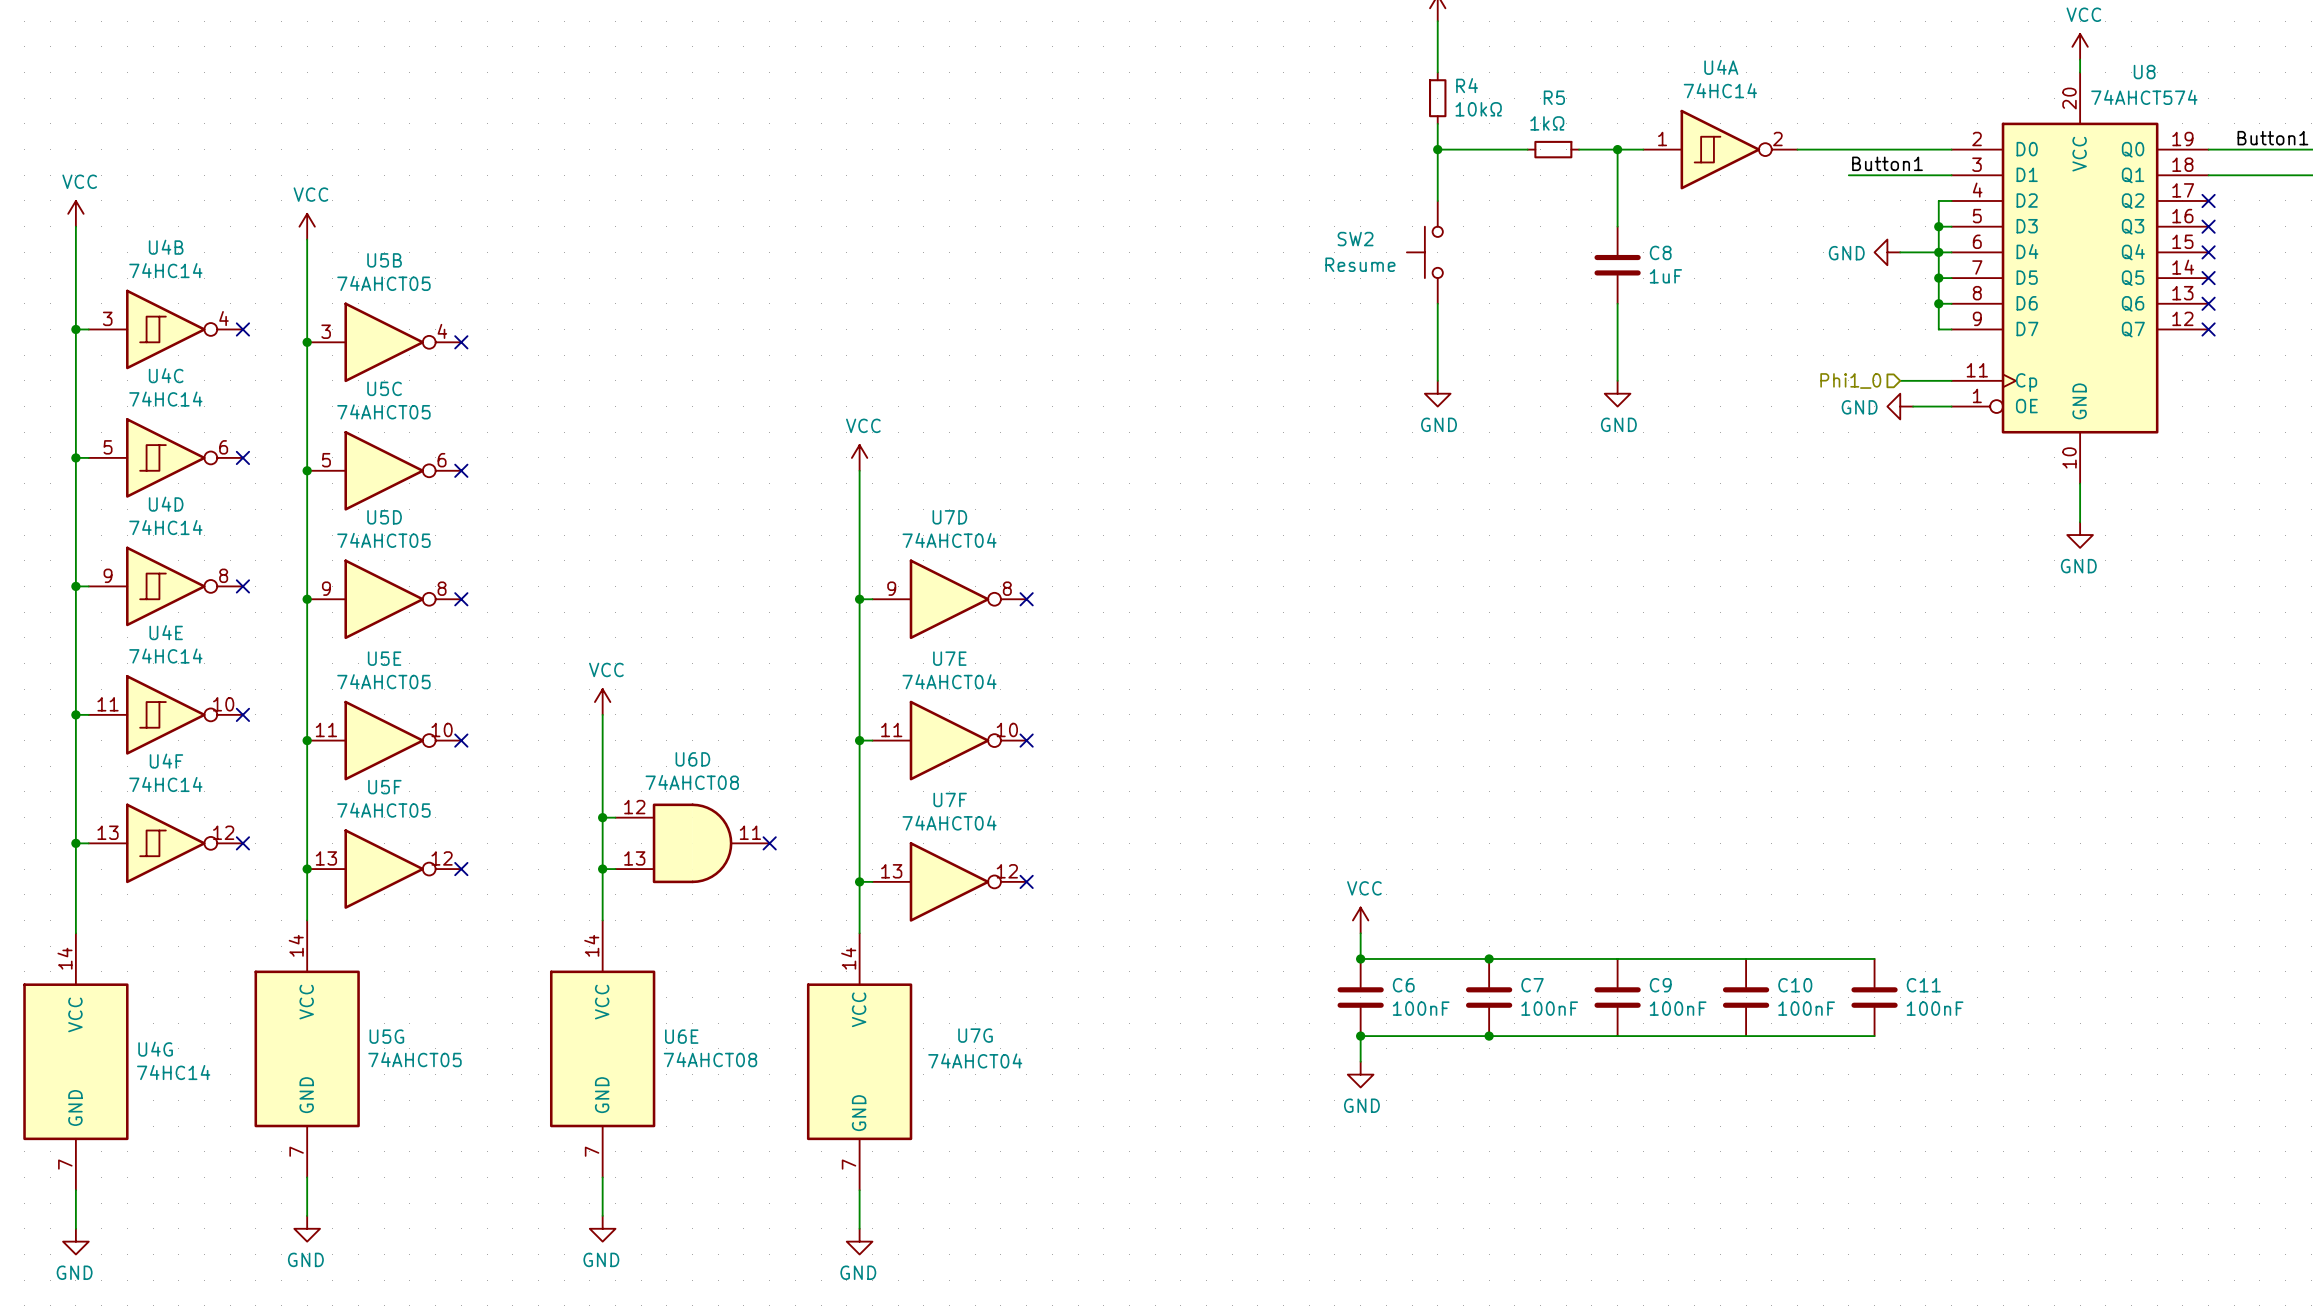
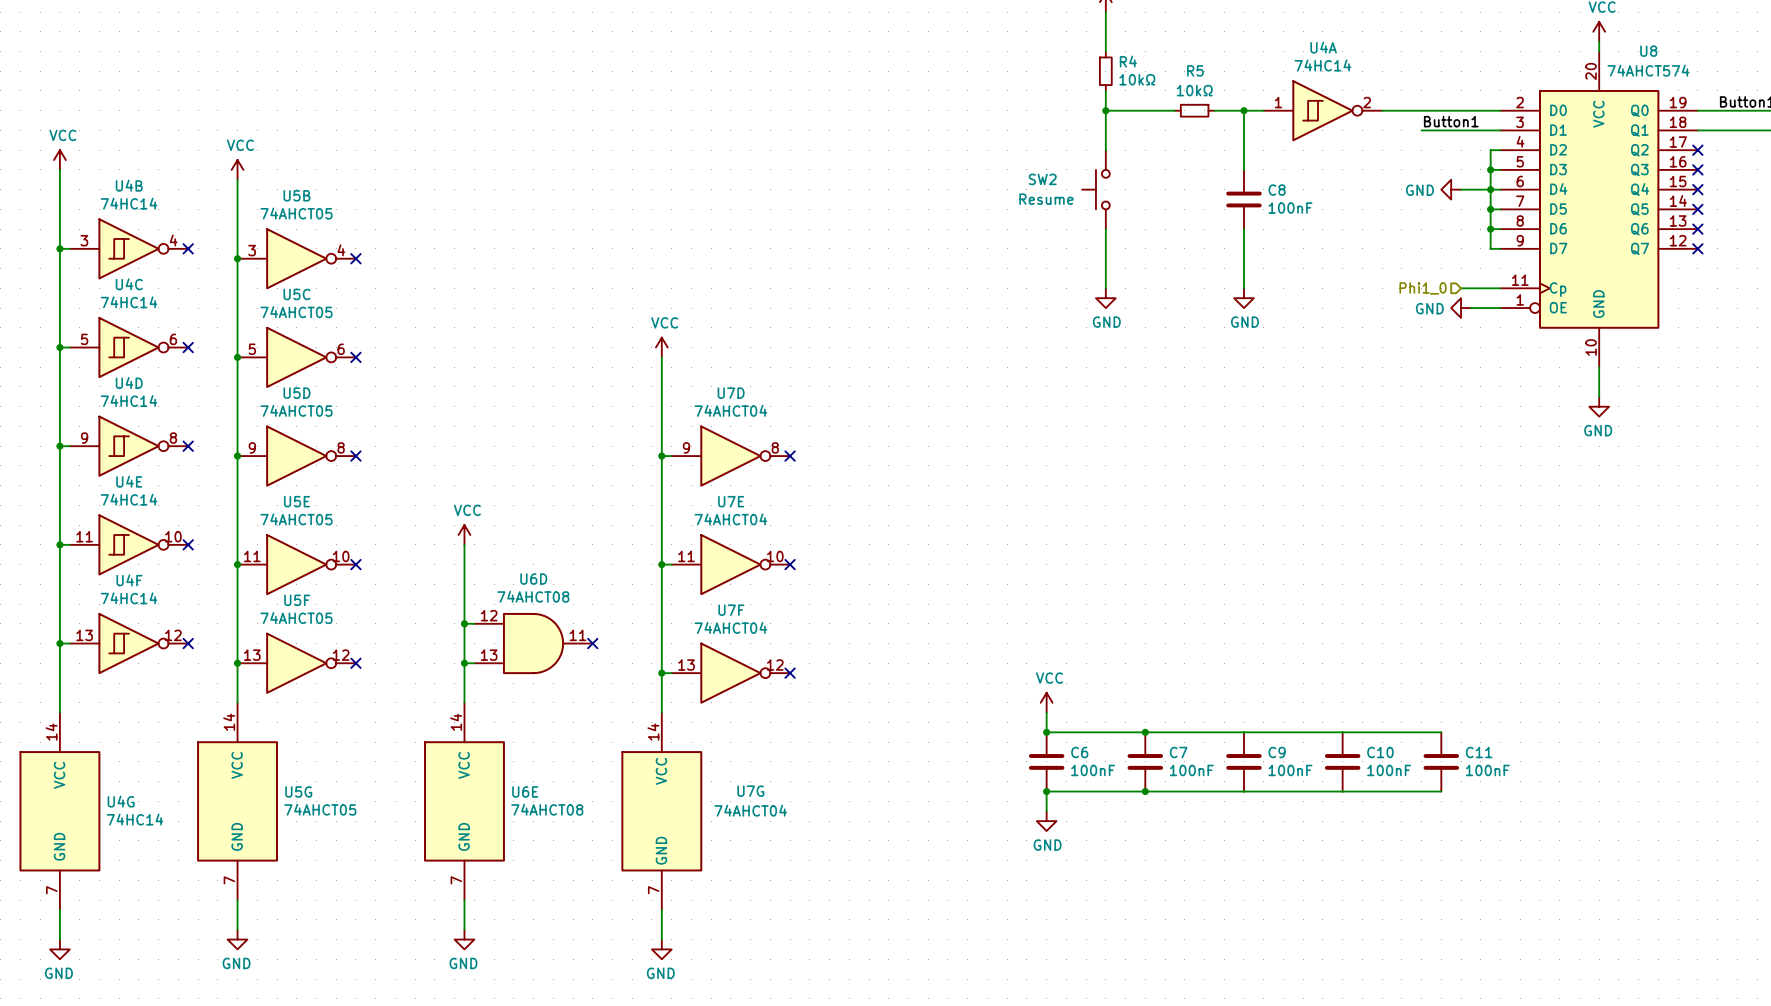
R5 value: 1kΩ (1547, 123) -> 10kΩ (1194, 90)
C8 value: 1uF (1665, 276) -> 100nF (1290, 208)

